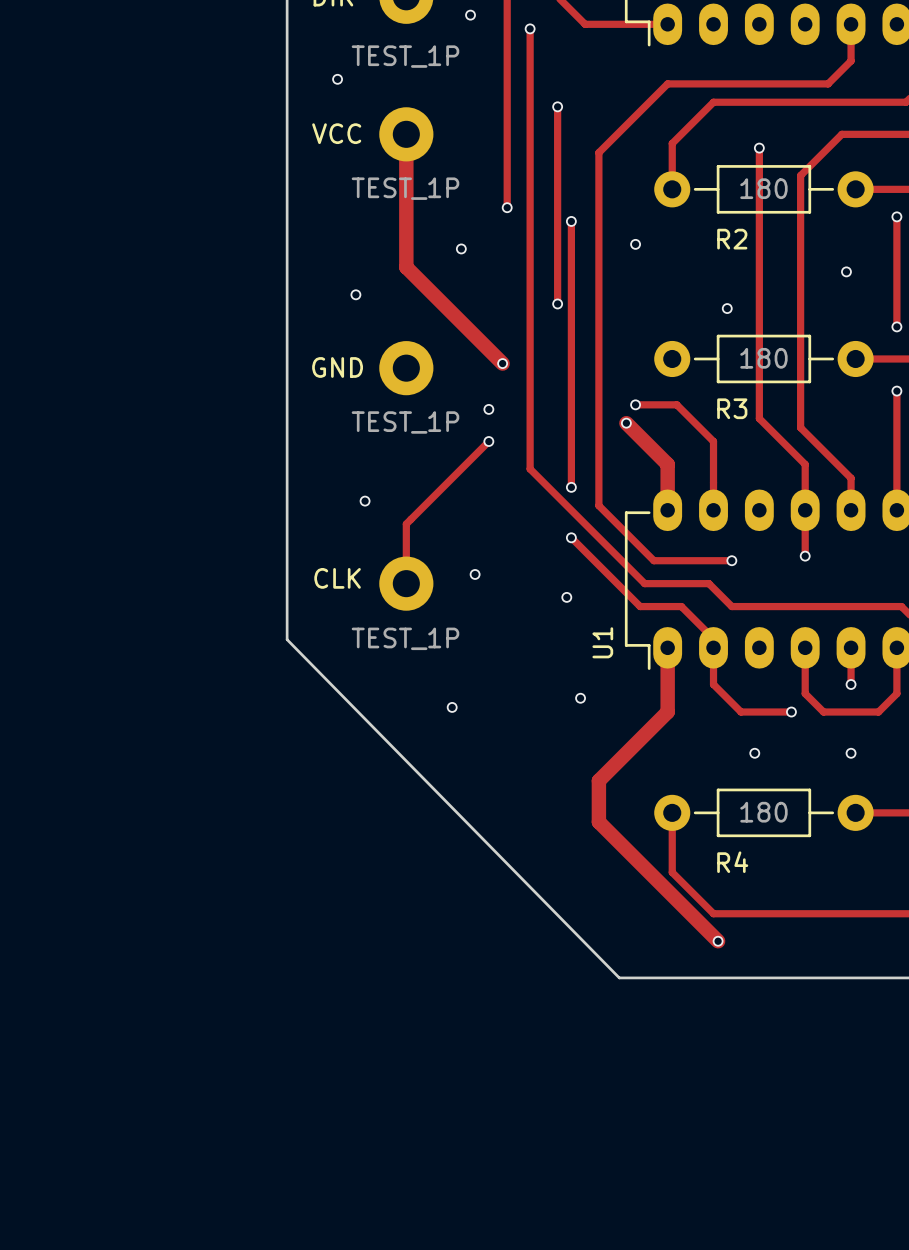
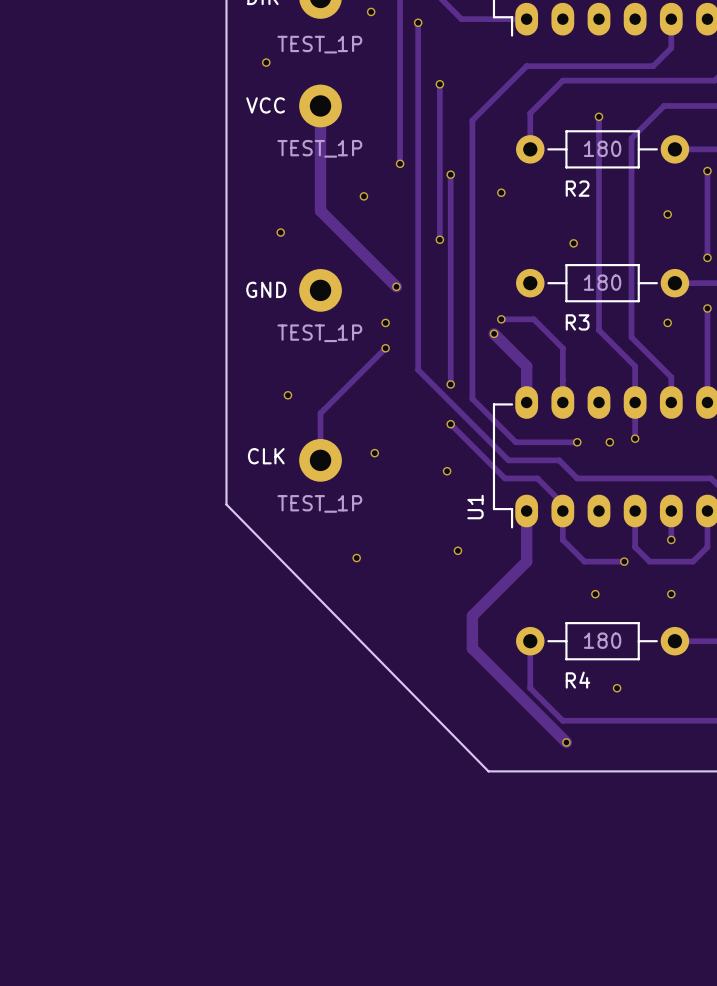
via: none -> (667, 322)
via: none -> (609, 442)
via: none -> (617, 688)

